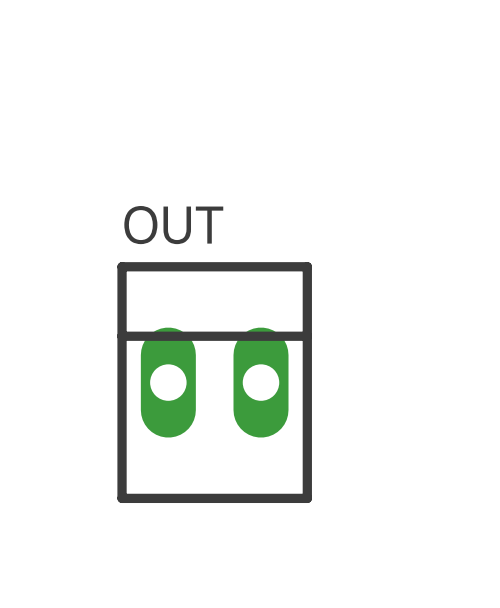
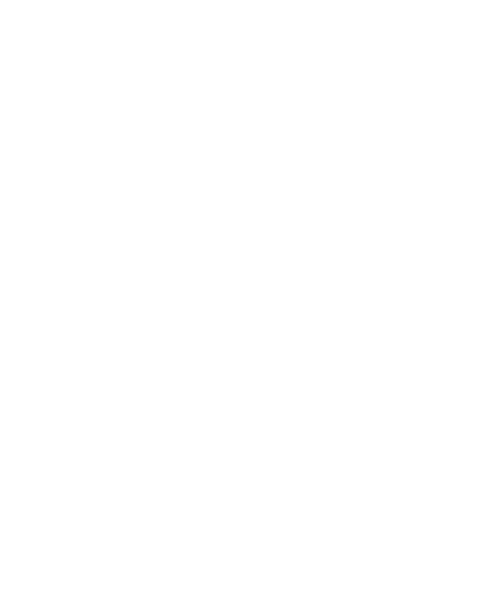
OUT: (214, 382) -> none

